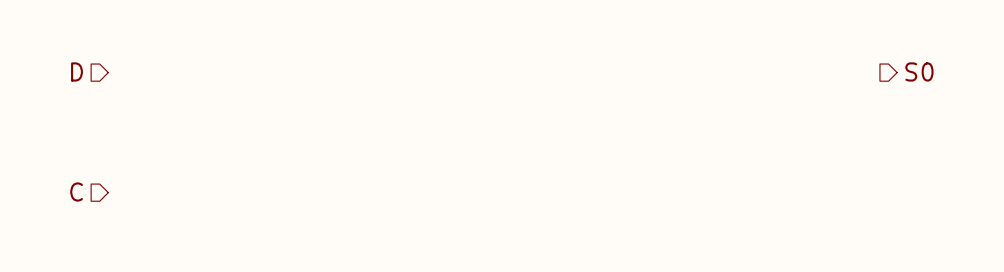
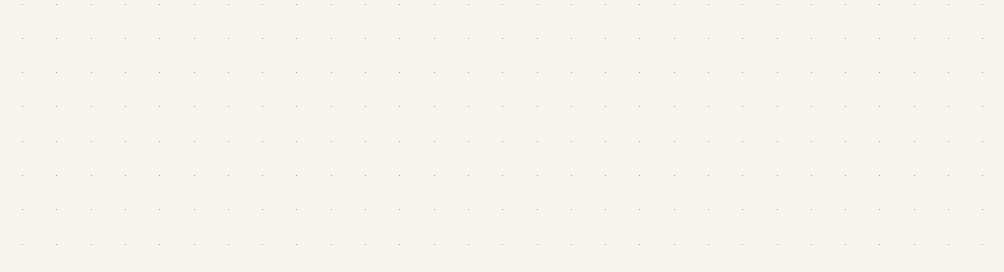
hierarchical label: D (76, 71) -> none
hierarchical label: S0 (919, 71) -> none
hierarchical label: C (76, 192) -> none

